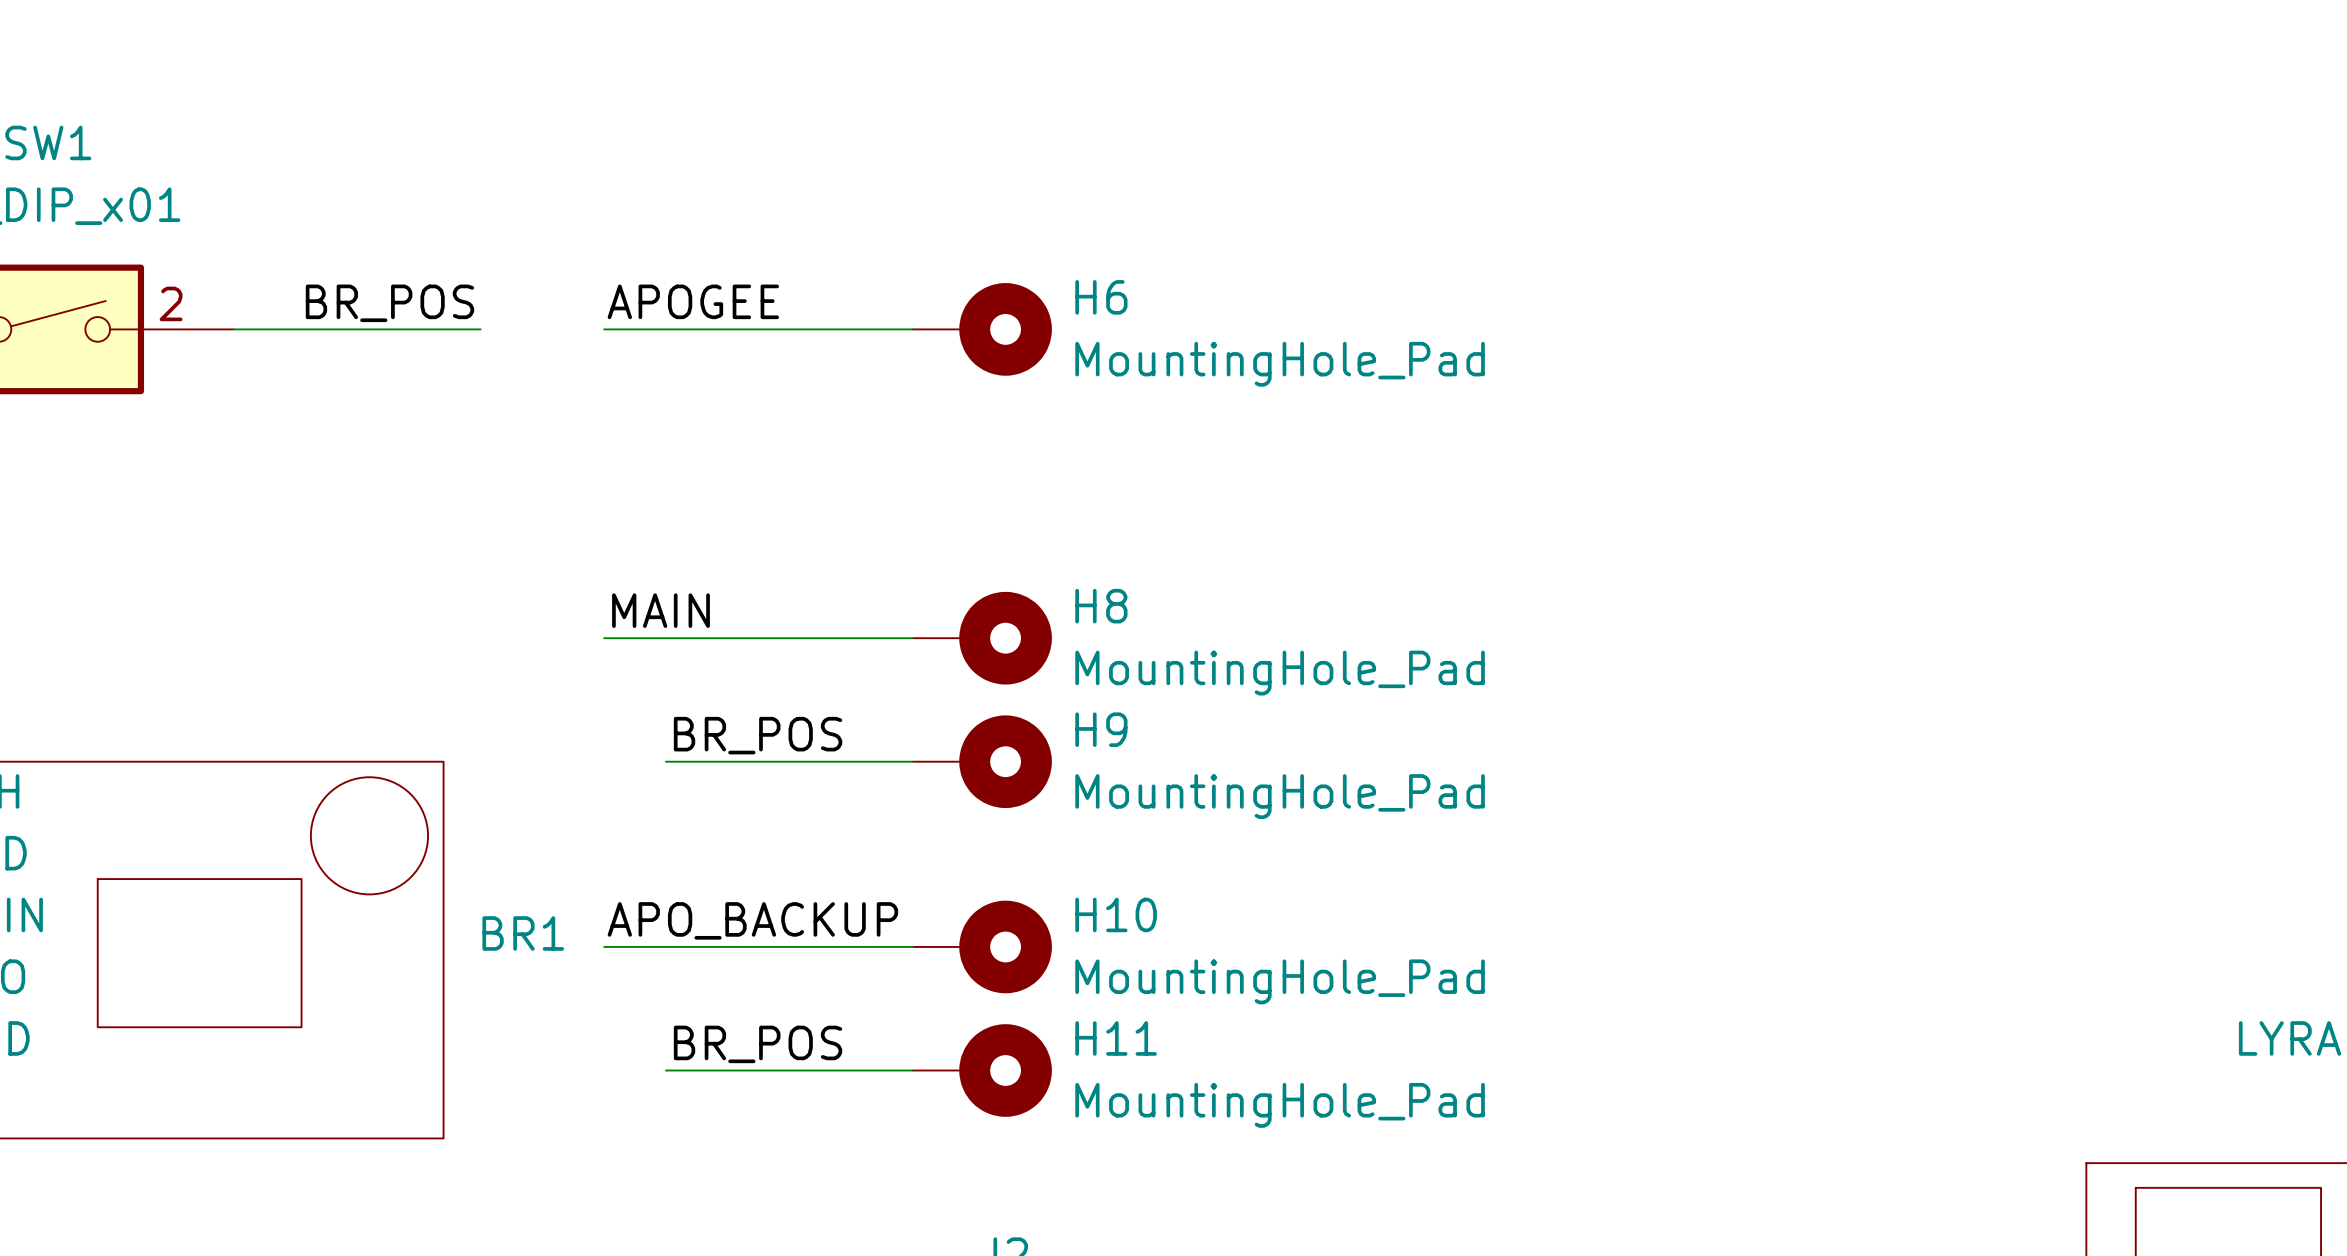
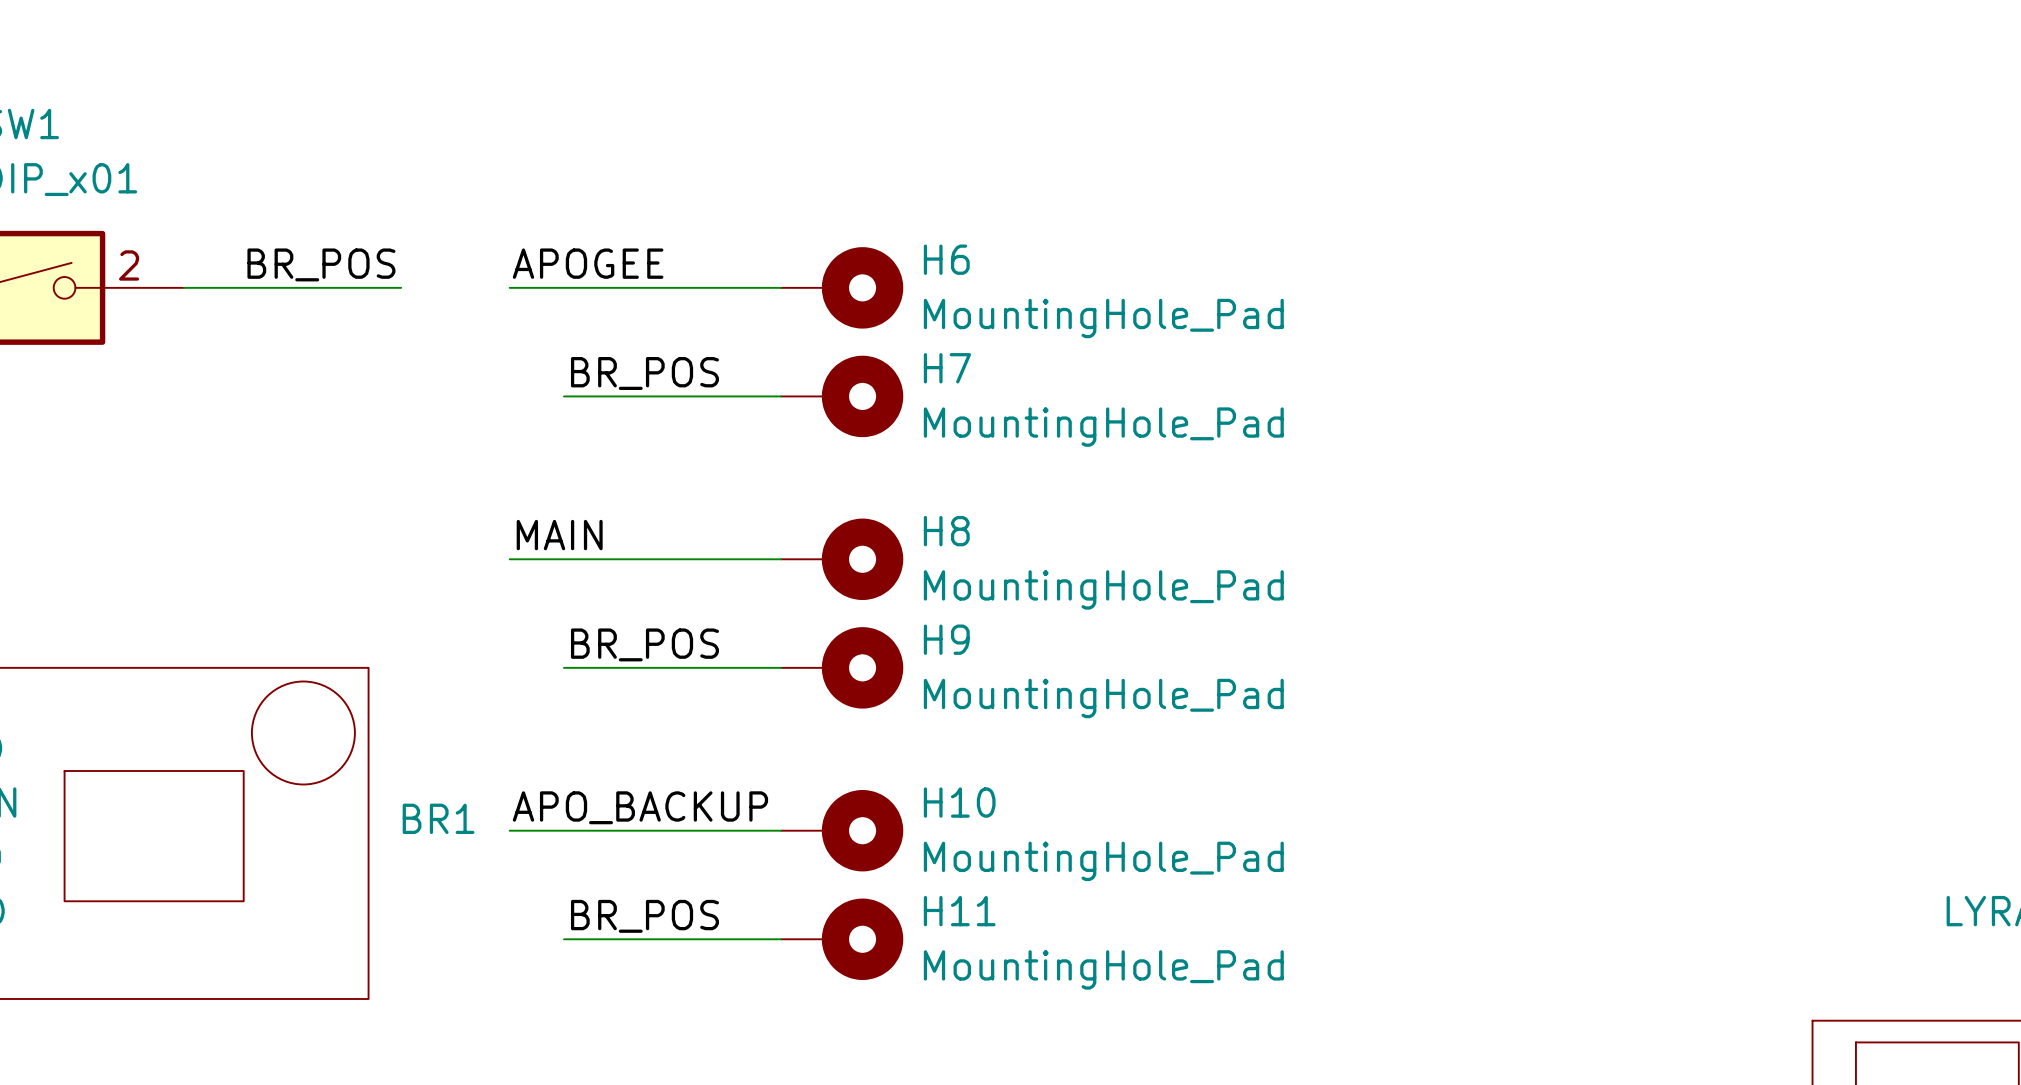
label: none -> BR_POS (644, 373)
wire: none -> (563, 396) (781, 396)
H7: none -> MountingHole_Pad (842, 396)

